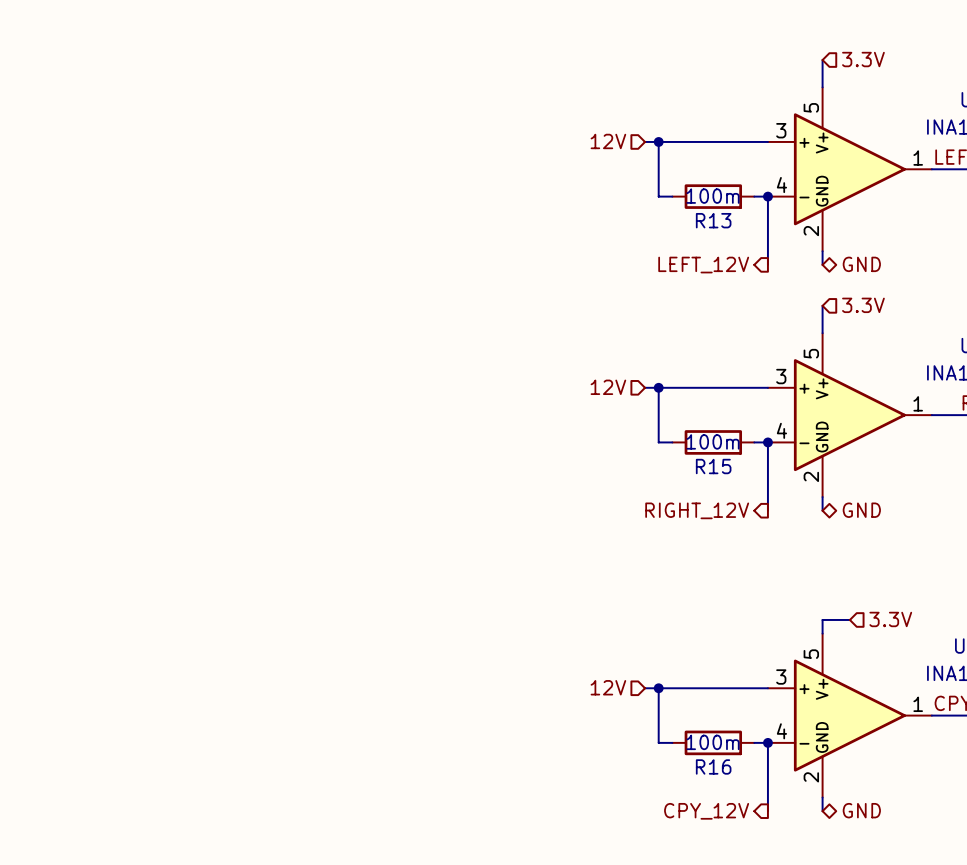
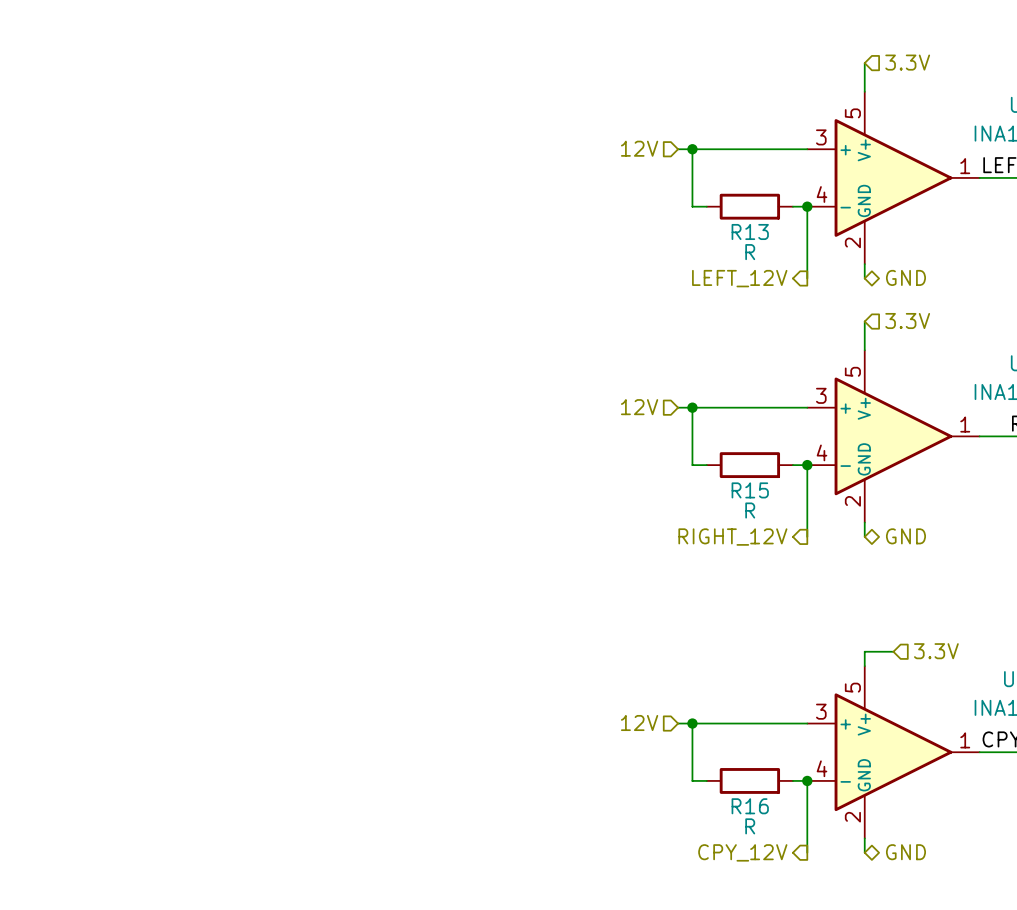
R13 value: 100m (713, 196) -> R (750, 252)
R15 value: 100m (713, 441) -> R (750, 510)
R16 value: 100m (713, 742) -> R (750, 826)

